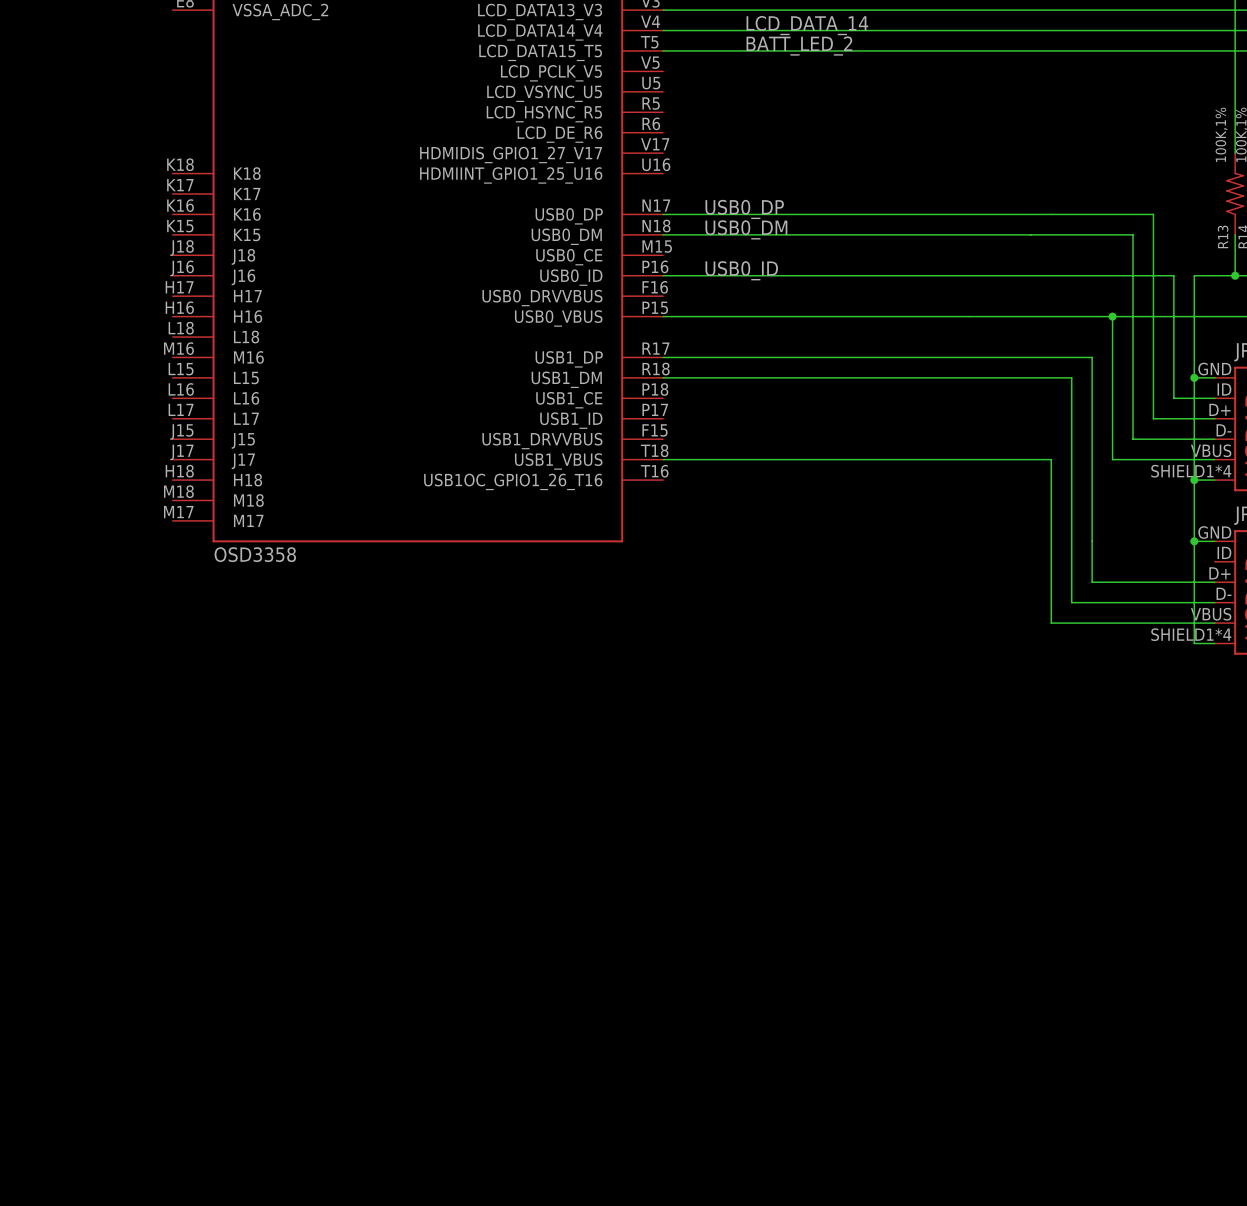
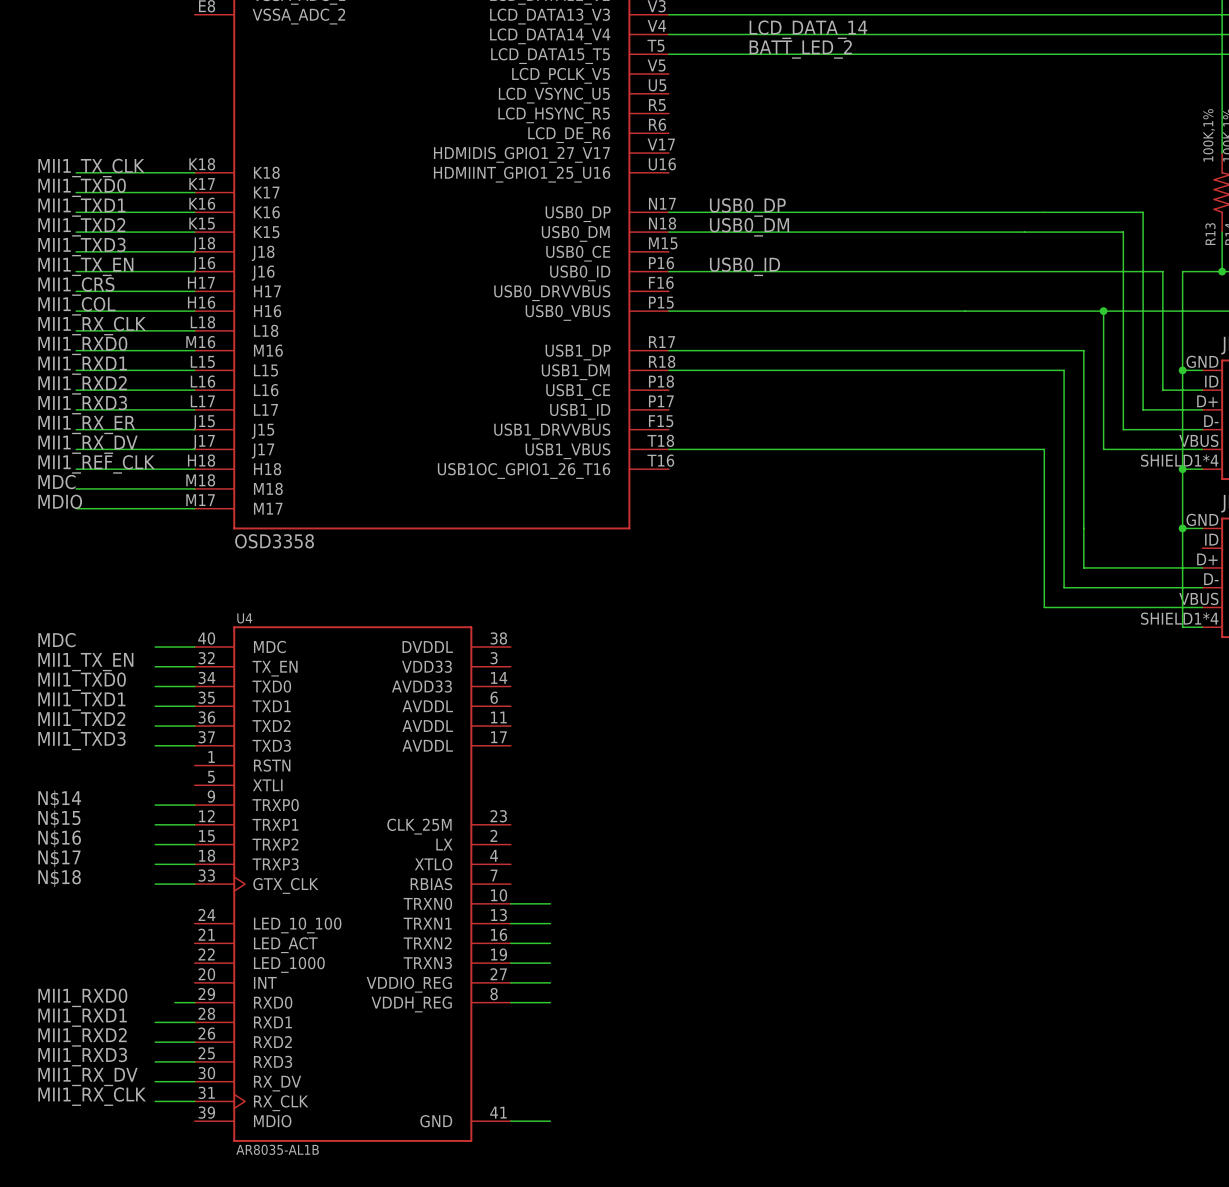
label: none -> MII1_TX_CLK (91, 168)
wire: none -> (76, 172) (194, 172)
label: none -> MII1_TXD0 (82, 187)
wire: none -> (76, 192) (194, 192)
label: none -> MII1_TXD1 (81, 207)
wire: none -> (76, 212) (194, 212)
label: none -> MII1_TXD2 (81, 227)
wire: none -> (76, 232) (194, 232)
label: none -> MII1_TXD3 (81, 247)
wire: none -> (76, 251) (194, 251)
label: none -> MII1_TX_EN (85, 266)
wire: none -> (76, 271) (194, 271)
label: none -> MII1_CRS (76, 286)
wire: none -> (76, 291) (194, 291)
label: none -> MII1_COL (76, 306)
wire: none -> (76, 311) (194, 311)
label: none -> MII1_RX_CLK (92, 326)
wire: none -> (76, 330) (194, 330)
label: none -> MII1_RXD0 (82, 345)
wire: none -> (76, 350) (194, 350)
label: none -> MII1_RXD1 (82, 365)
wire: none -> (76, 370) (194, 370)
label: none -> MII1_RXD2 (82, 385)
wire: none -> (76, 390) (194, 390)
label: none -> MII1_RXD3 (82, 405)
wire: none -> (76, 409) (194, 409)
label: none -> MII1_RX_ER (86, 424)
wire: none -> (76, 429) (194, 429)
label: none -> MII1_RX_DV (87, 444)
wire: none -> (76, 449) (194, 449)
label: none -> MII1_REF_CLK (96, 464)
wire: none -> (76, 469) (194, 469)
label: none -> MDC (56, 482)
wire: none -> (76, 488) (194, 488)
label: none -> MDIO (60, 501)
wire: none -> (76, 508) (194, 508)
label: none -> MDC (56, 640)
wire: none -> (155, 647) (194, 647)
label: none -> MII1_TX_EN (85, 662)
wire: none -> (155, 666) (194, 666)
label: none -> MII1_TXD0 (82, 681)
wire: none -> (155, 686) (194, 686)
label: none -> MII1_TXD1 (81, 701)
wire: none -> (155, 706) (194, 706)
label: none -> MII1_TXD2 (81, 721)
wire: none -> (155, 726) (194, 726)
label: none -> MII1_TXD3 (81, 740)
wire: none -> (155, 745) (194, 745)
label: none -> N$14 (59, 799)
wire: none -> (155, 805) (194, 805)
label: none -> N$15 (59, 819)
wire: none -> (155, 824) (194, 824)
label: none -> N$16 (59, 838)
wire: none -> (155, 844) (194, 844)
label: none -> N$17 (59, 858)
wire: none -> (155, 864) (194, 864)
label: none -> N$18 (59, 878)
wire: none -> (155, 884) (194, 884)
U4: none -> AR8035-AL1B (352, 884)
wire: none -> (510, 903) (550, 903)
wire: none -> (510, 923) (550, 923)
wire: none -> (510, 943) (550, 943)
wire: none -> (510, 963) (550, 963)
wire: none -> (510, 982) (550, 982)
label: none -> MII1_RXD0 (82, 997)
wire: none -> (174, 1002) (194, 1002)
wire: none -> (510, 1002) (550, 1002)
label: none -> MII1_RXD1 (82, 1017)
wire: none -> (155, 1022) (194, 1022)
label: none -> MII1_RXD2 (82, 1037)
wire: none -> (155, 1042) (194, 1042)
label: none -> MII1_RXD3 (82, 1057)
wire: none -> (155, 1061) (194, 1061)
label: none -> MII1_RX_DV (87, 1076)
wire: none -> (155, 1081) (194, 1081)
label: none -> MII1_RX_CLK (92, 1096)
wire: none -> (155, 1101) (194, 1101)
wire: none -> (510, 1121) (550, 1121)

